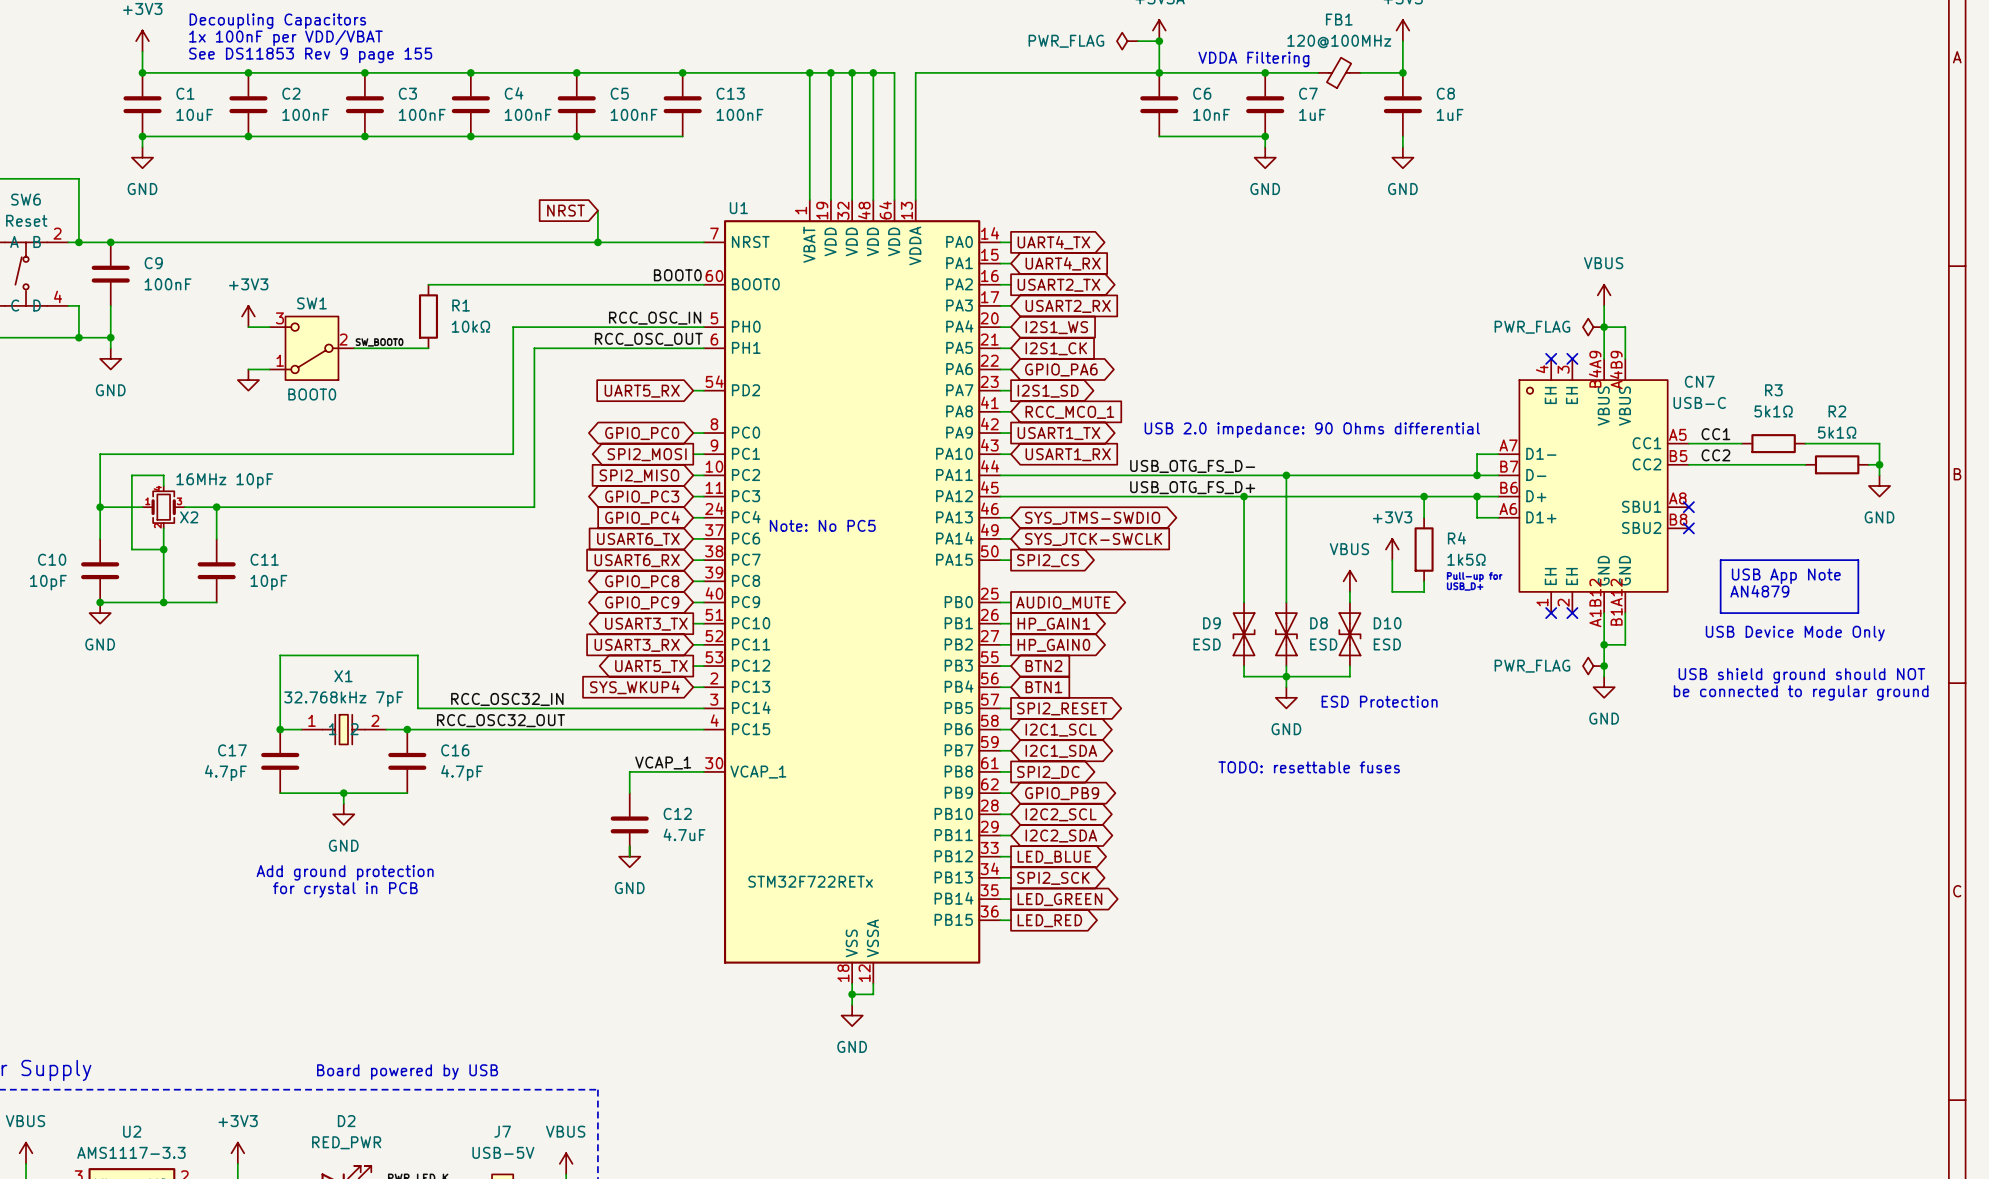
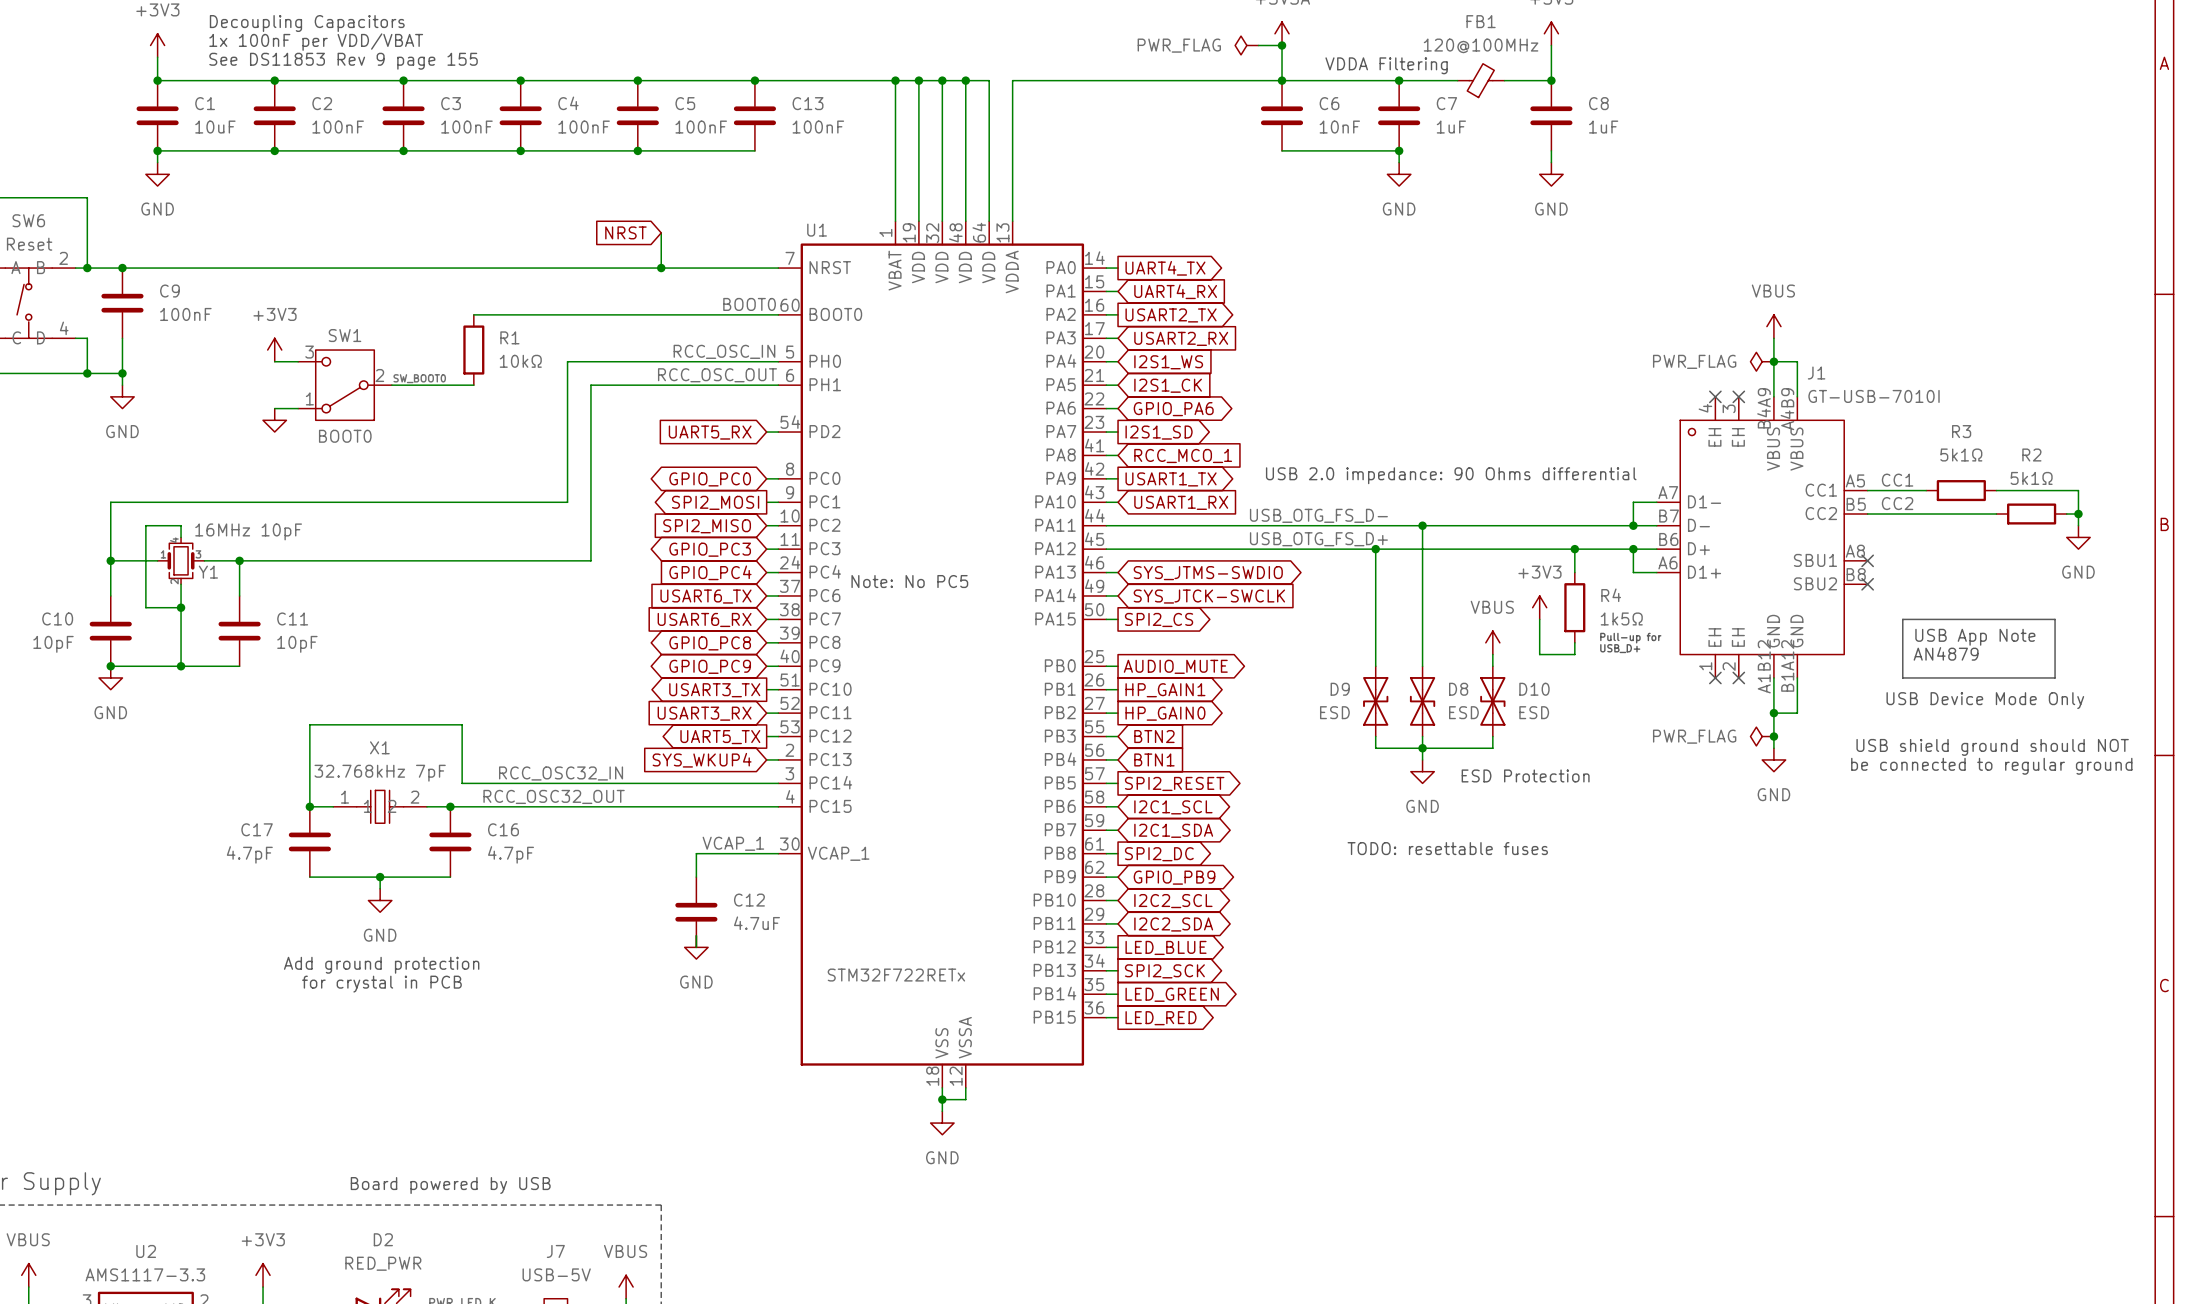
CN7 name: CN7 (1699, 381) -> J1 (1816, 373)
CN7 value: USB-C (1699, 402) -> GT-USB-7010I (1874, 396)
X2 name: X2 (189, 517) -> Y1 (208, 572)

